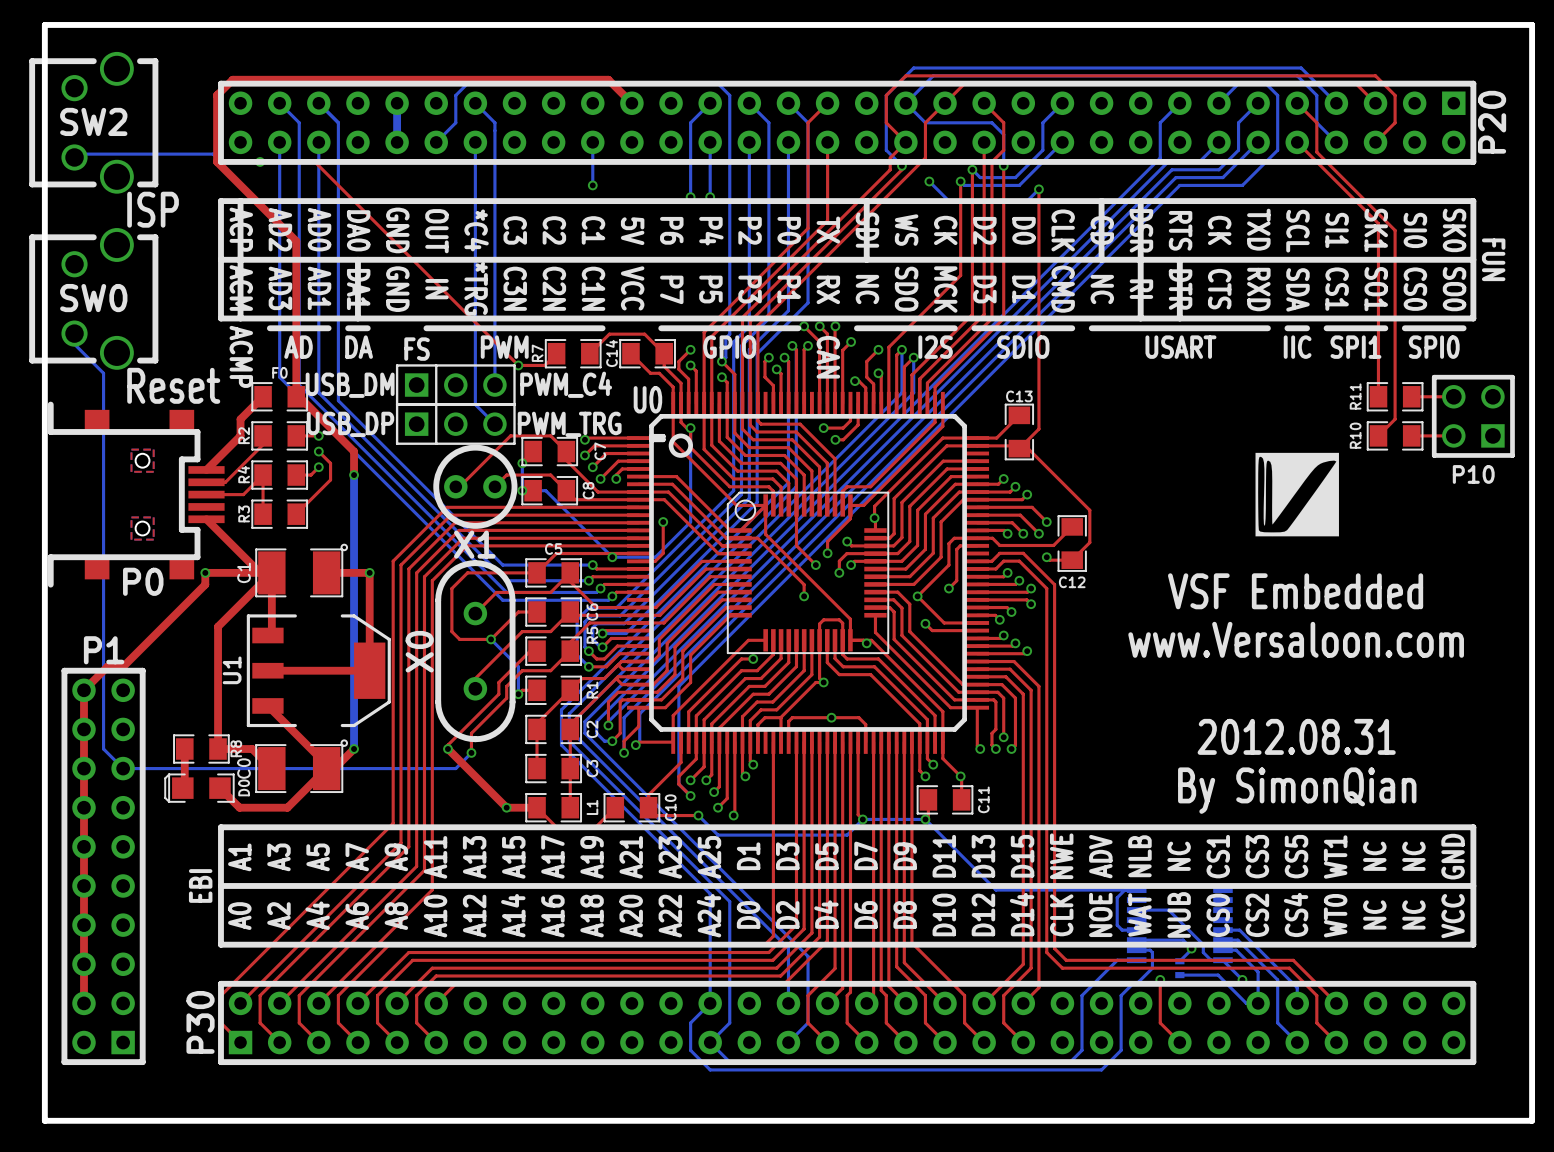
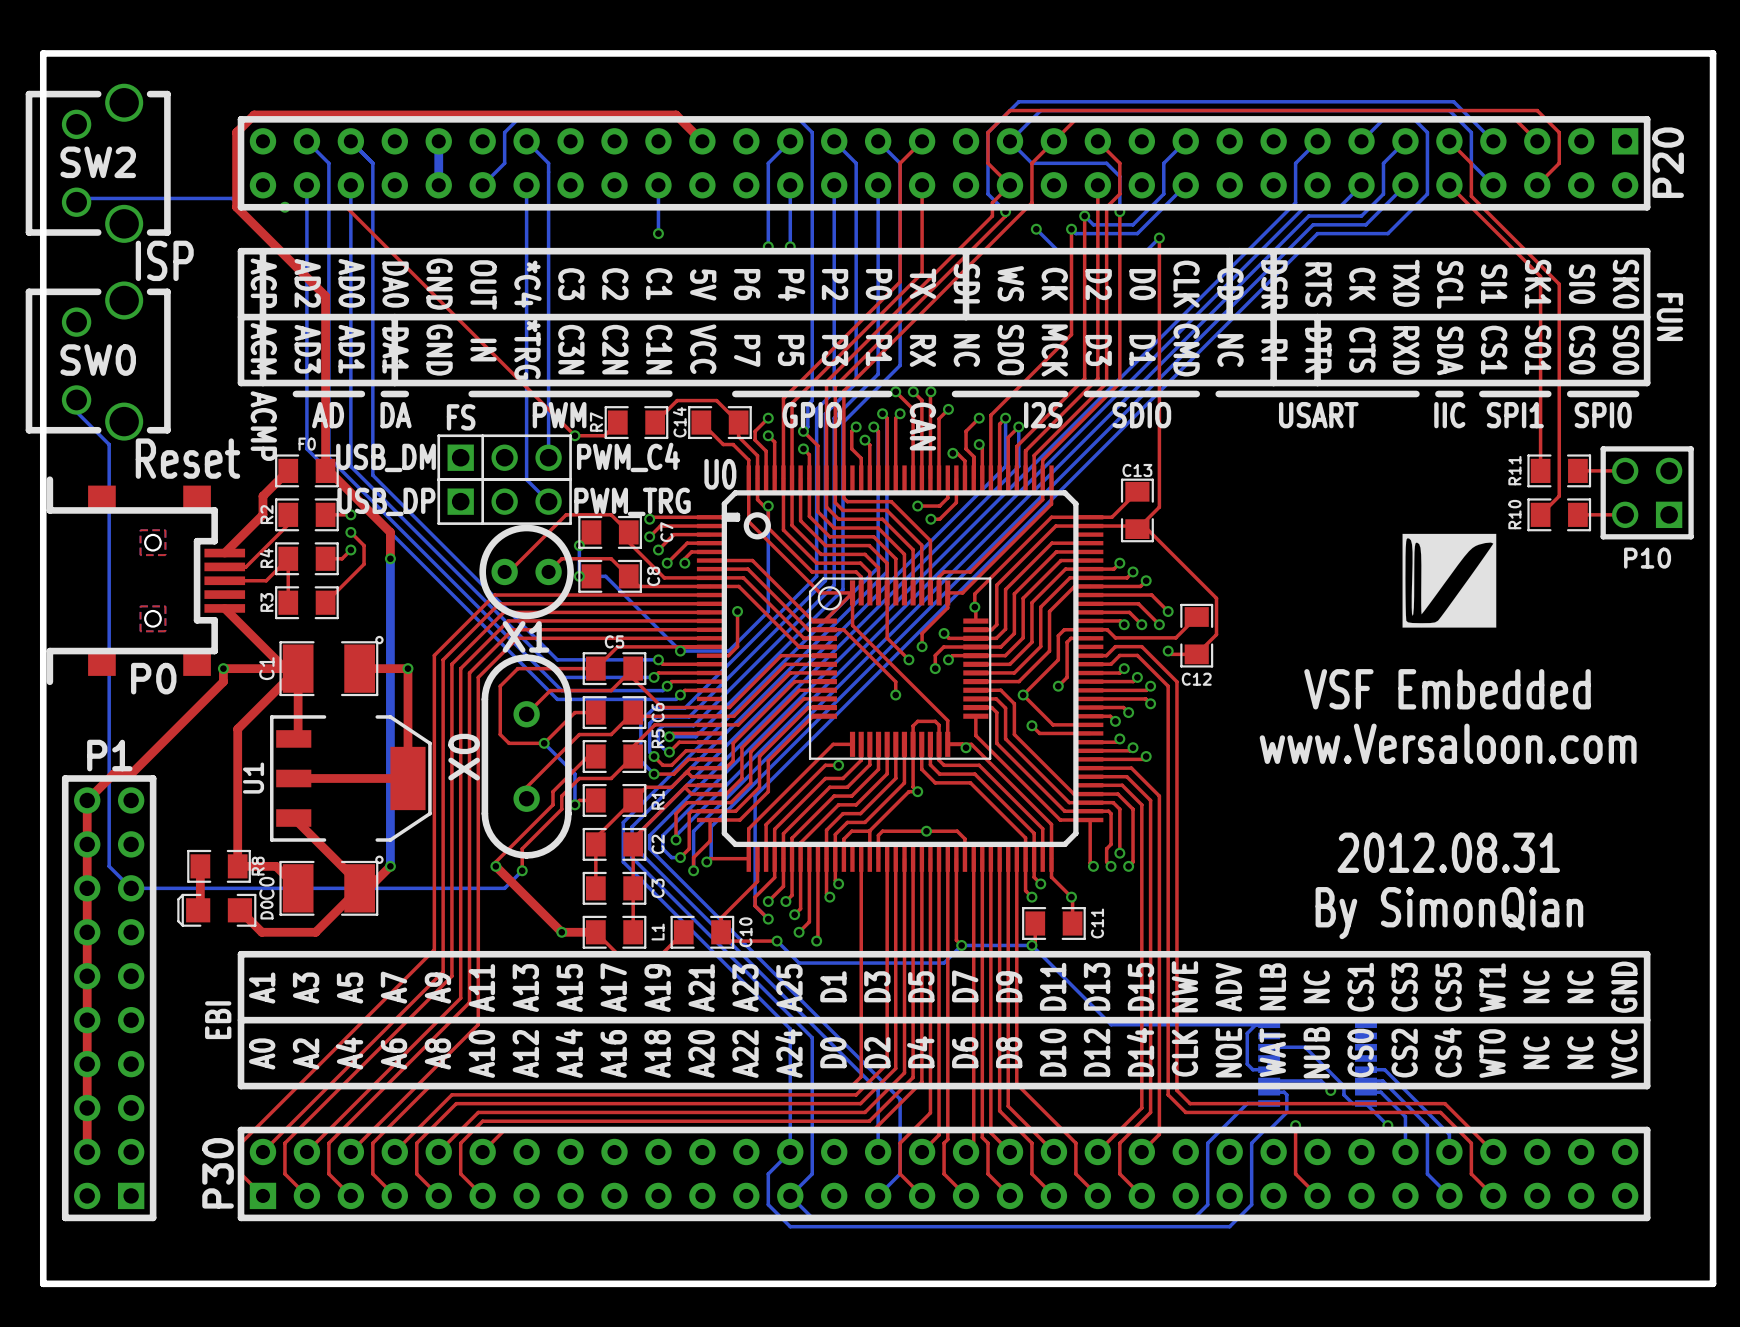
bottom track: (1191, 948) (1179, 961) -> none
part: (1179, 968) -> none
bottom track: (1179, 975) (1218, 975) (1246, 1003) (1258, 1003) -> none

